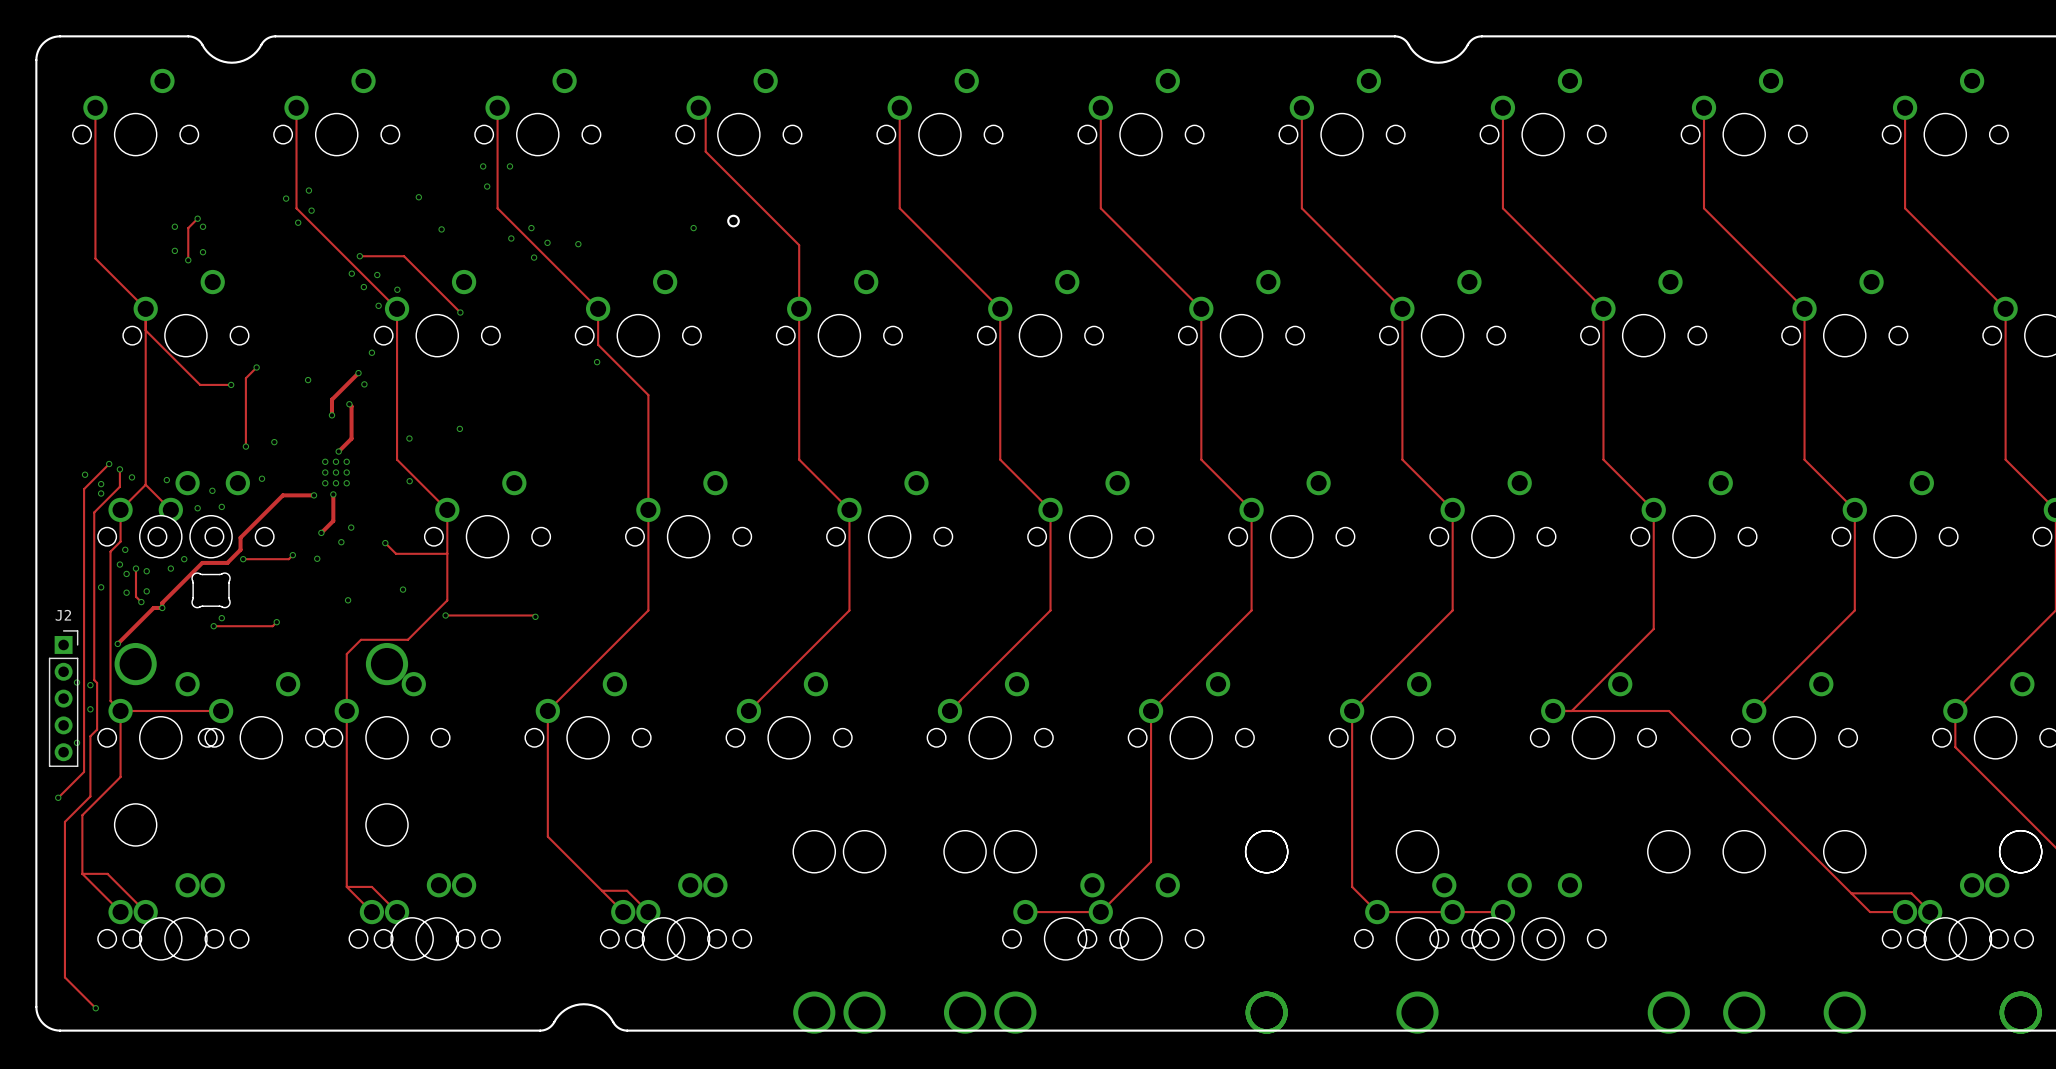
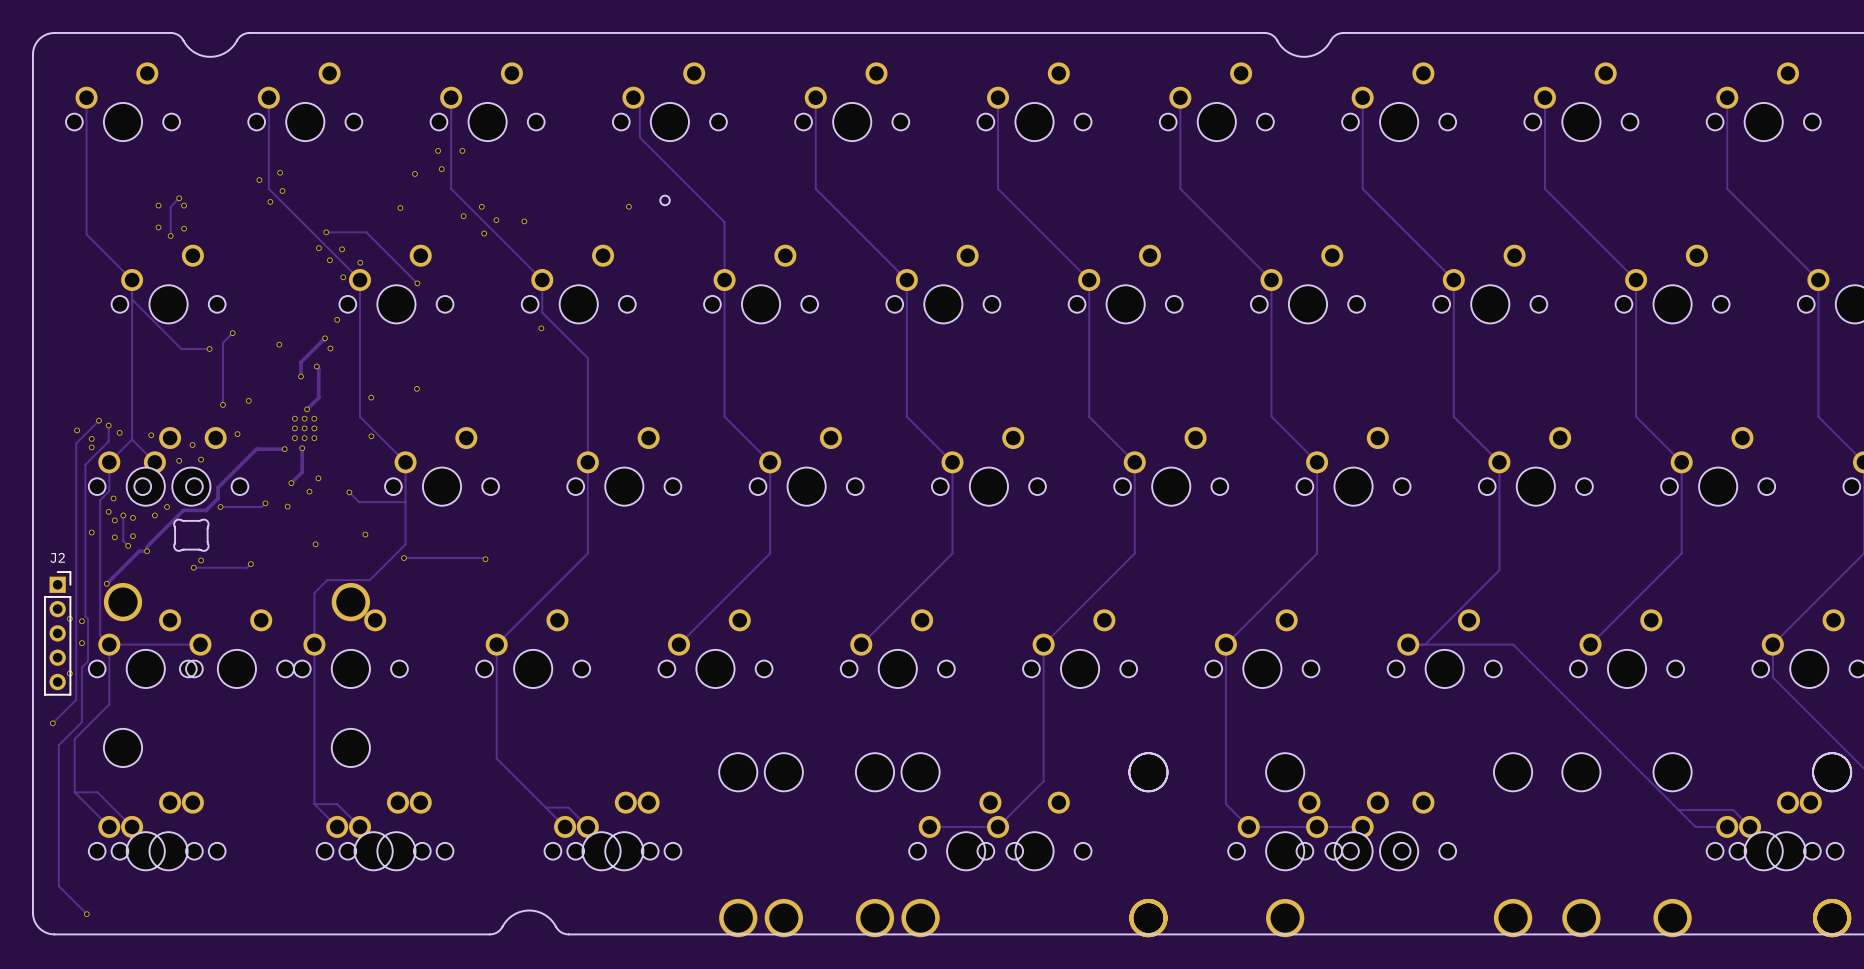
via position: (418, 197) -> (414, 173)

